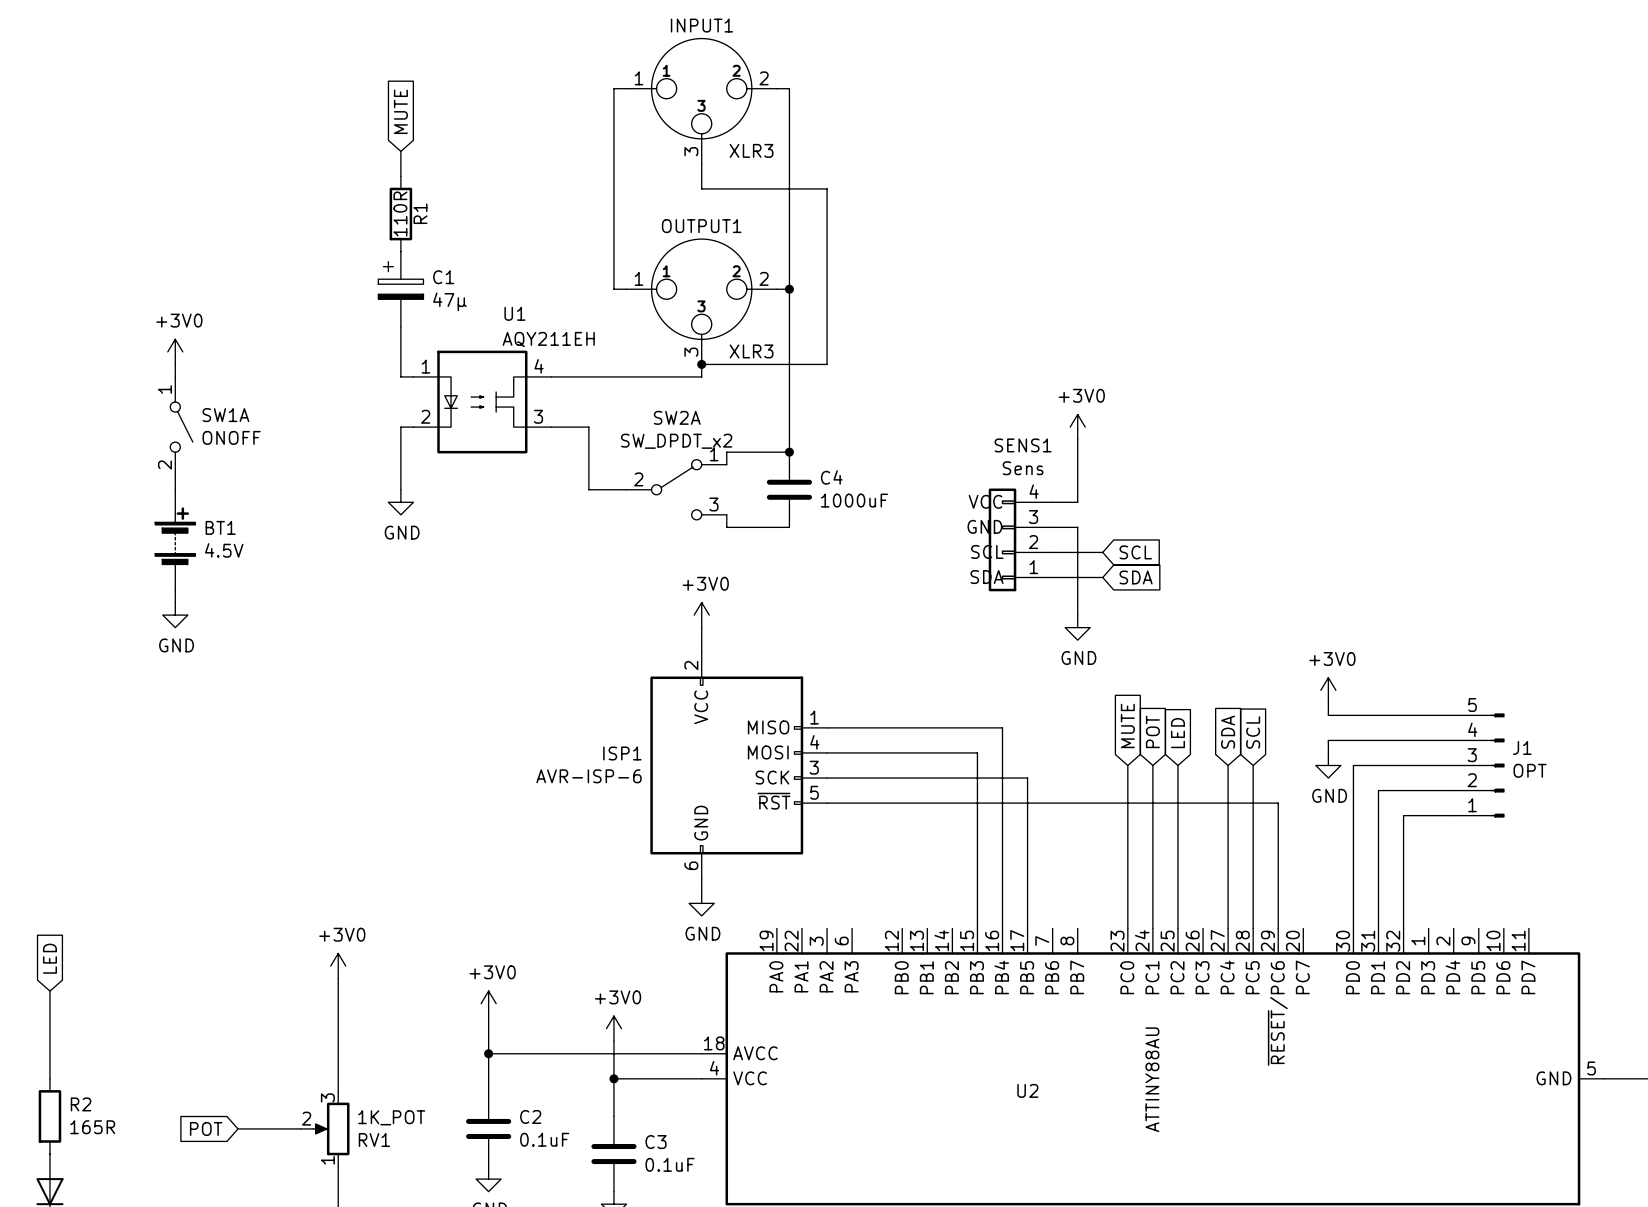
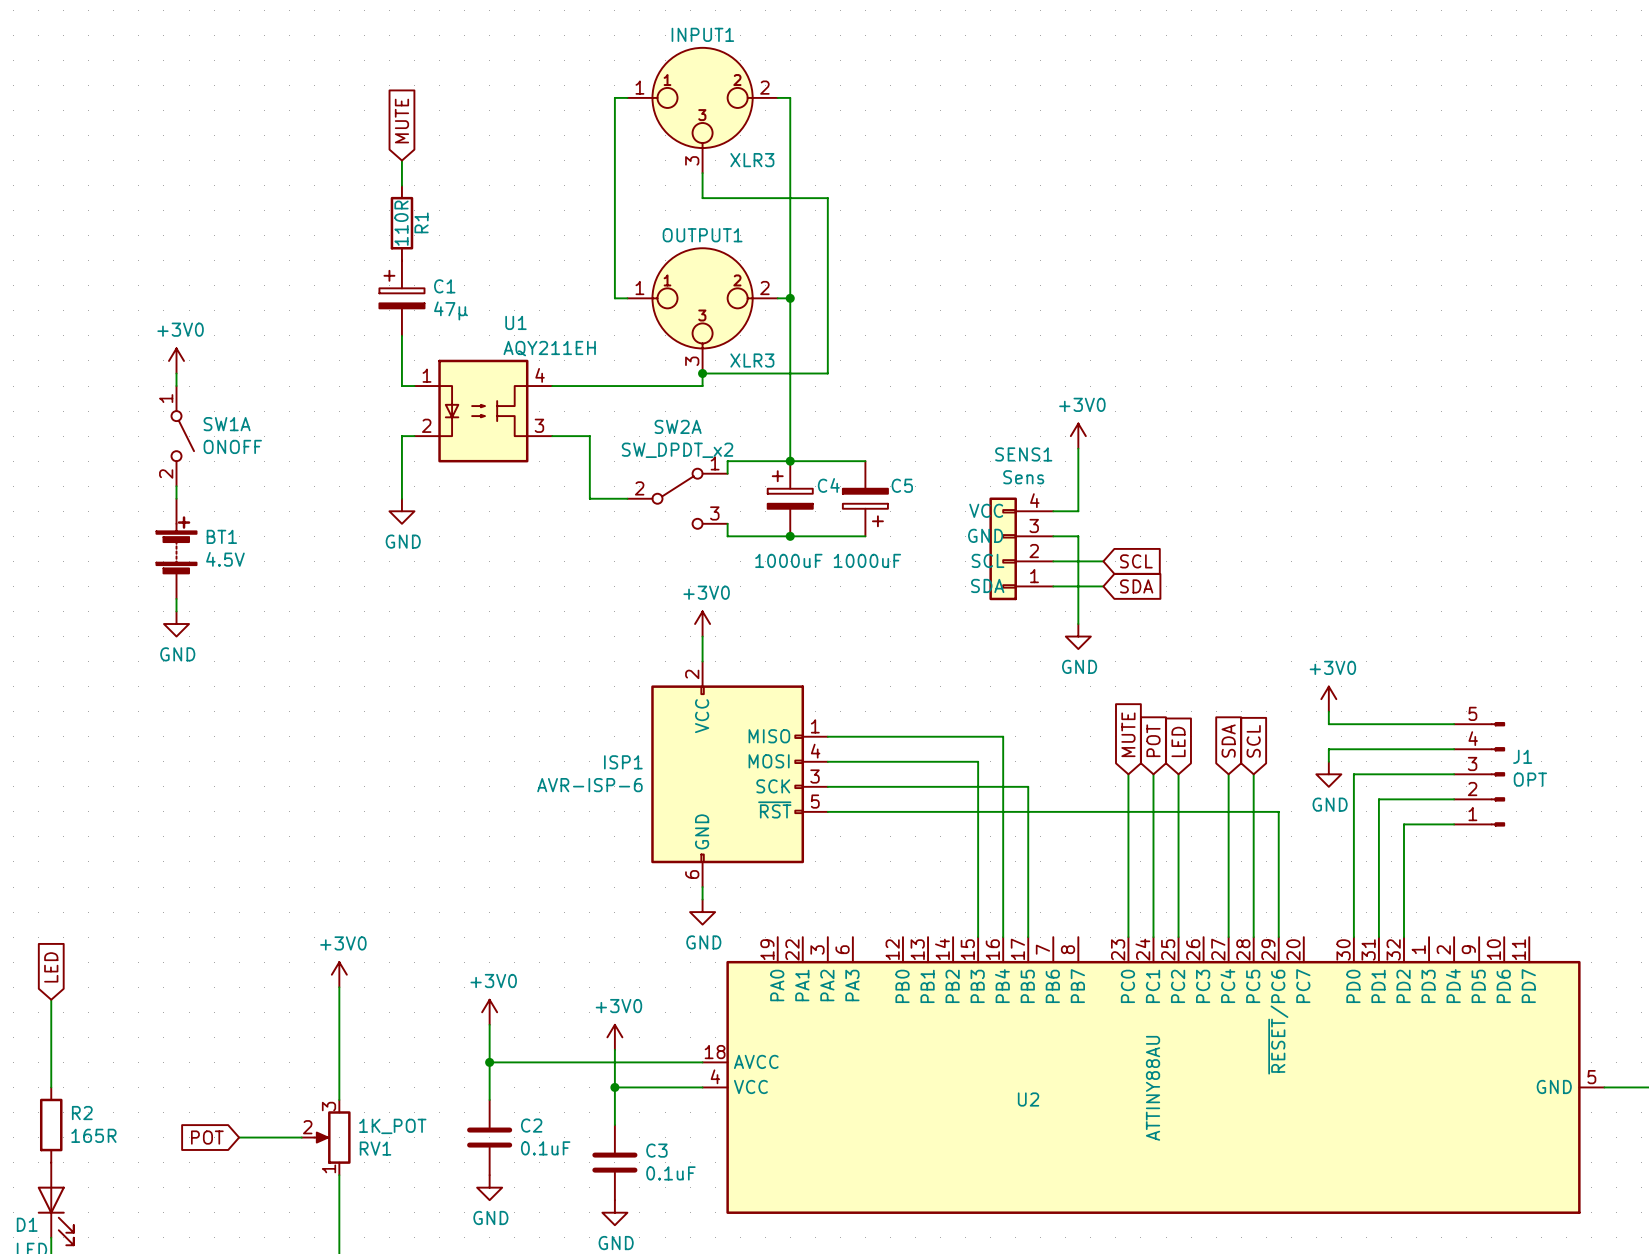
C4 symbol: [766, 452, 812, 528] -> [767, 461, 813, 537]
wire: none -> (790, 461) (865, 461)
C5: none -> 1000uF (865, 498)
C4 value position: 1000uF (854, 500) -> 1000uF (788, 560)
wire: none -> (790, 536) (865, 536)
junction: none -> (790, 536)

